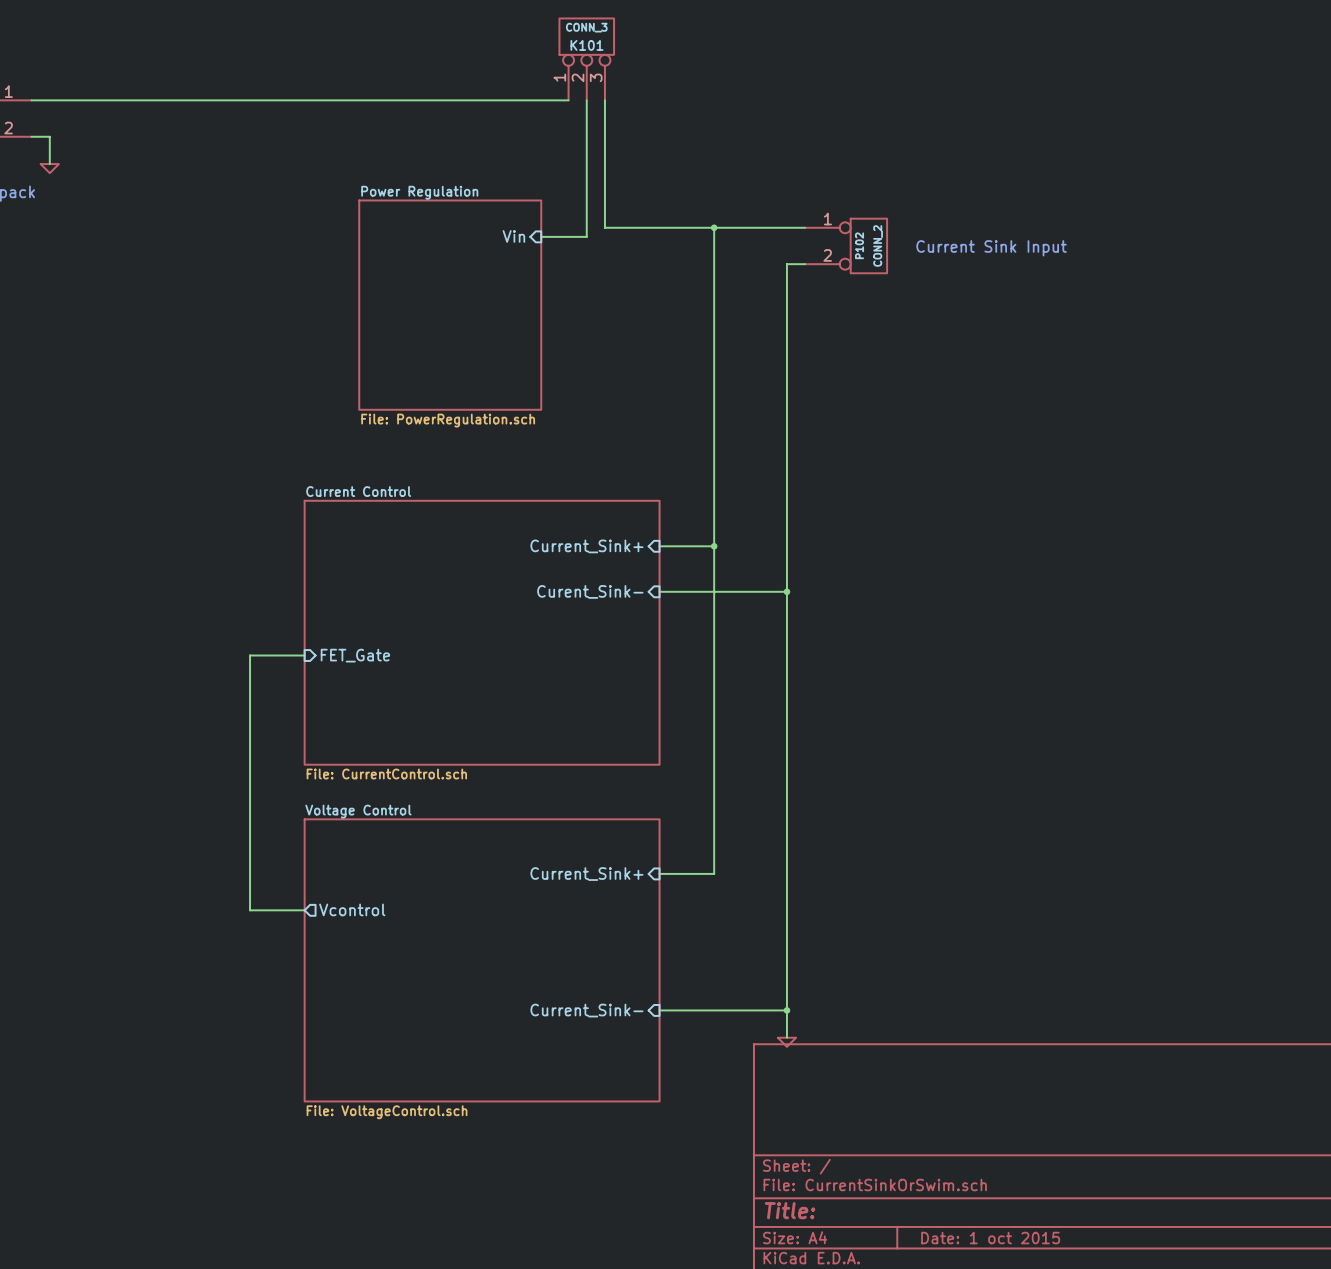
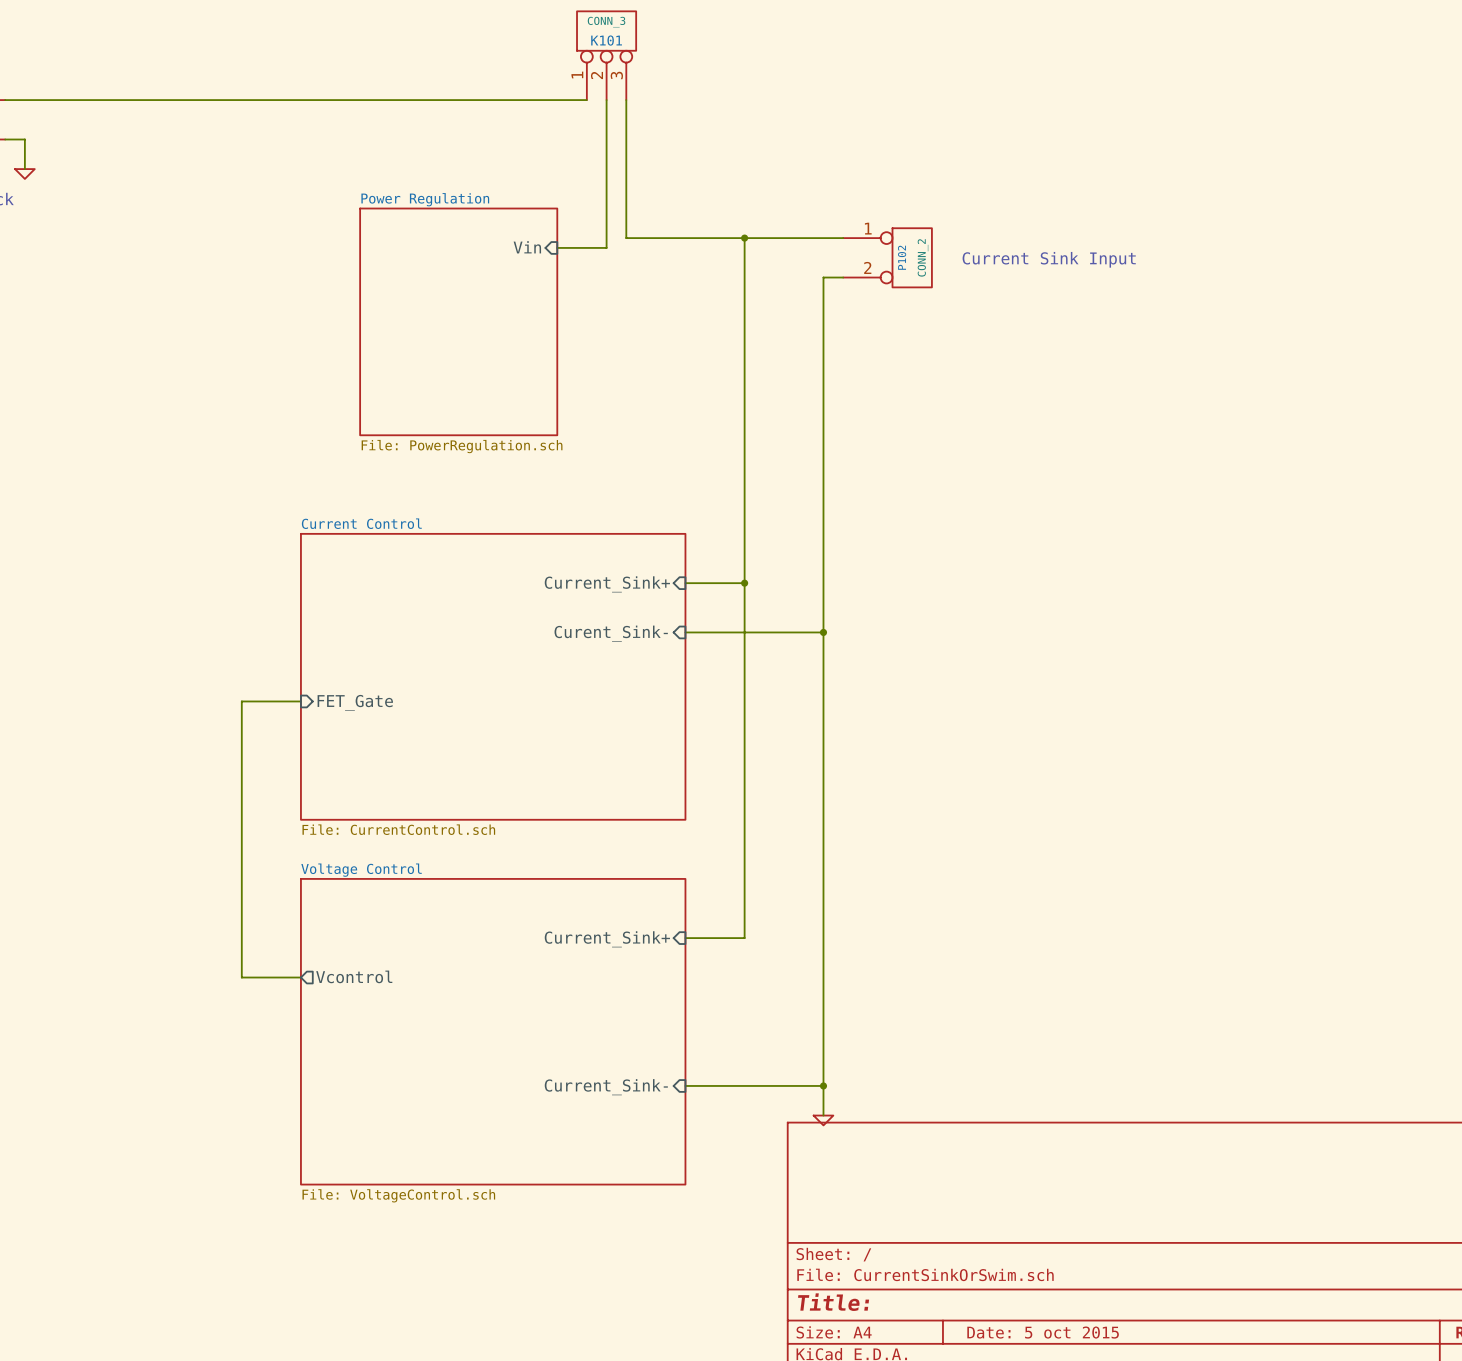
title block: Date: 1 oct 2015 (990, 1238) -> Date: 5 oct 2015 (1043, 1332)

